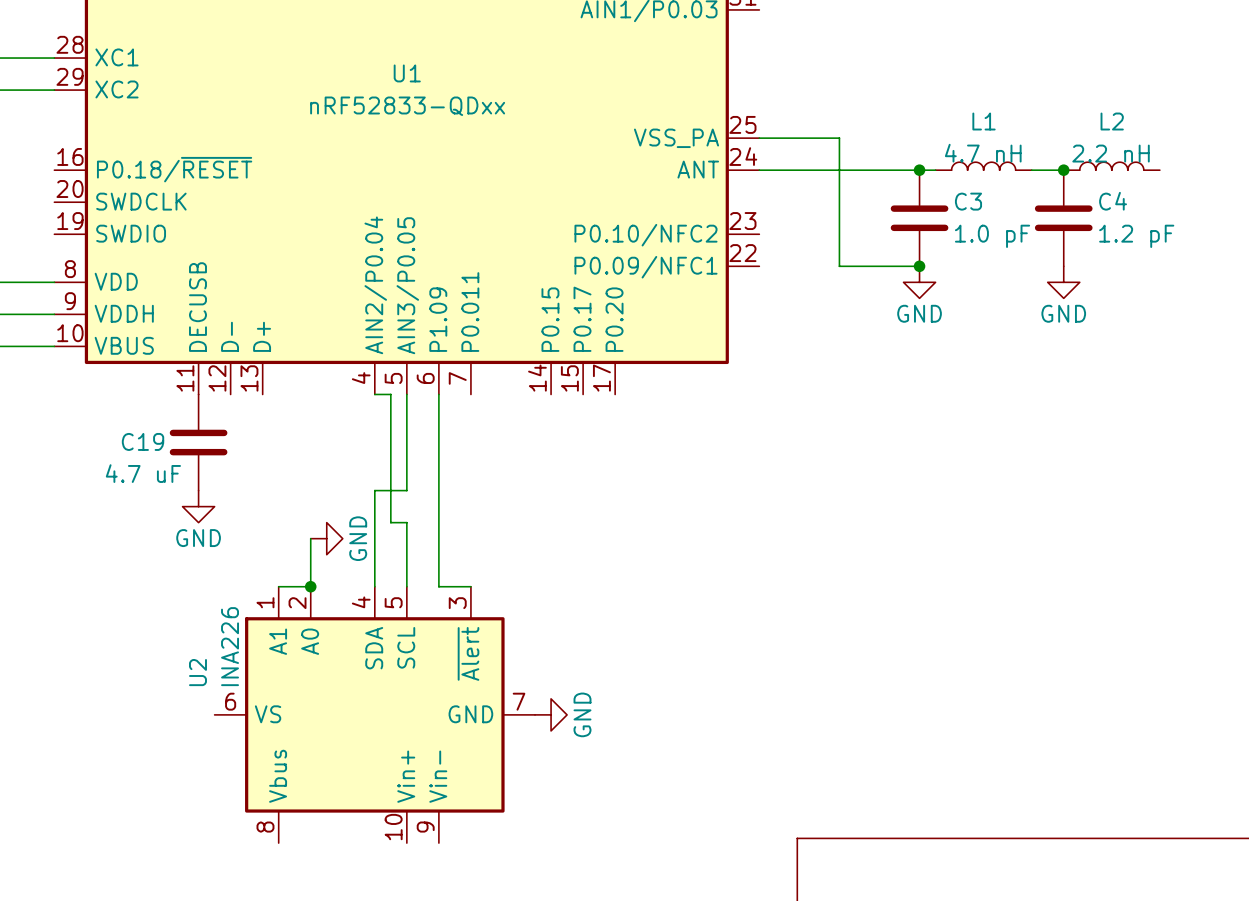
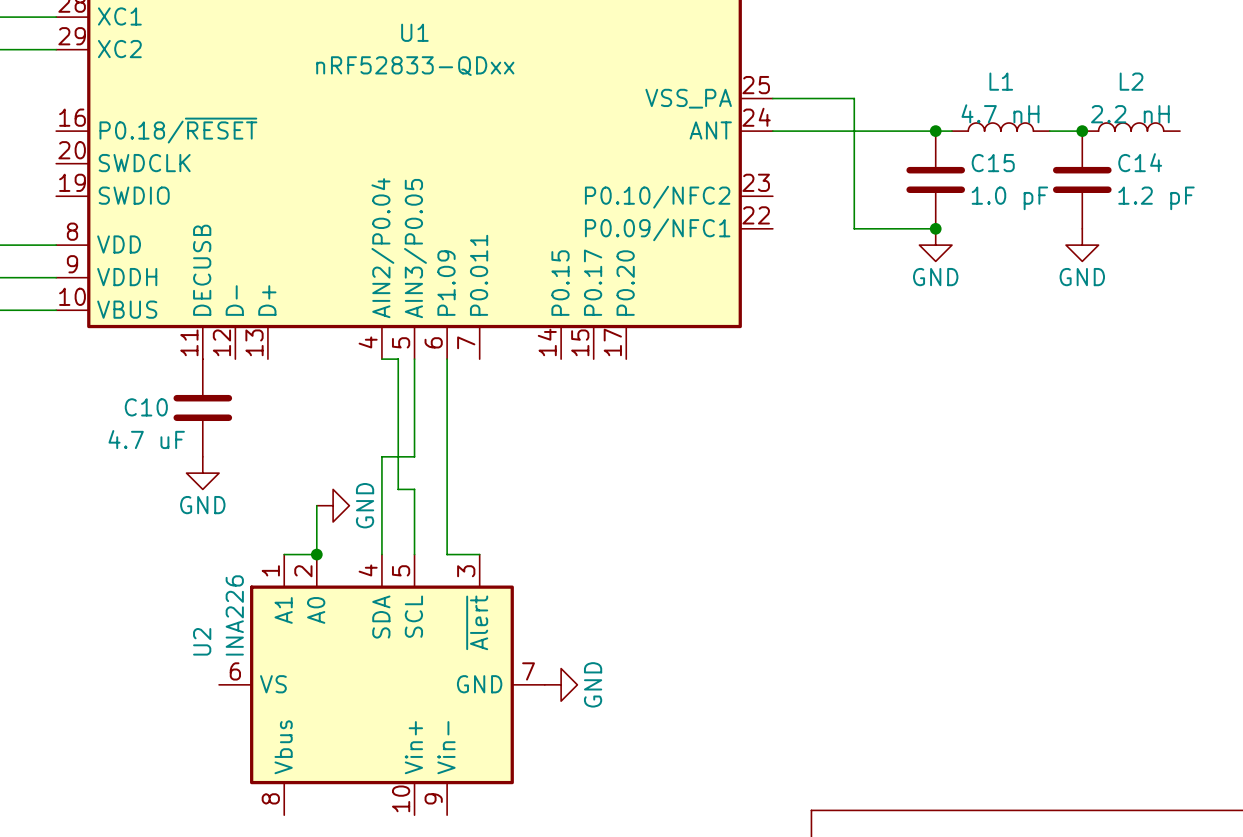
C3 name: C3 (968, 201) -> C15 (993, 163)
C4 name: C4 (1113, 201) -> C14 (1140, 162)
C19 name: C19 (143, 441) -> C10 (146, 407)

